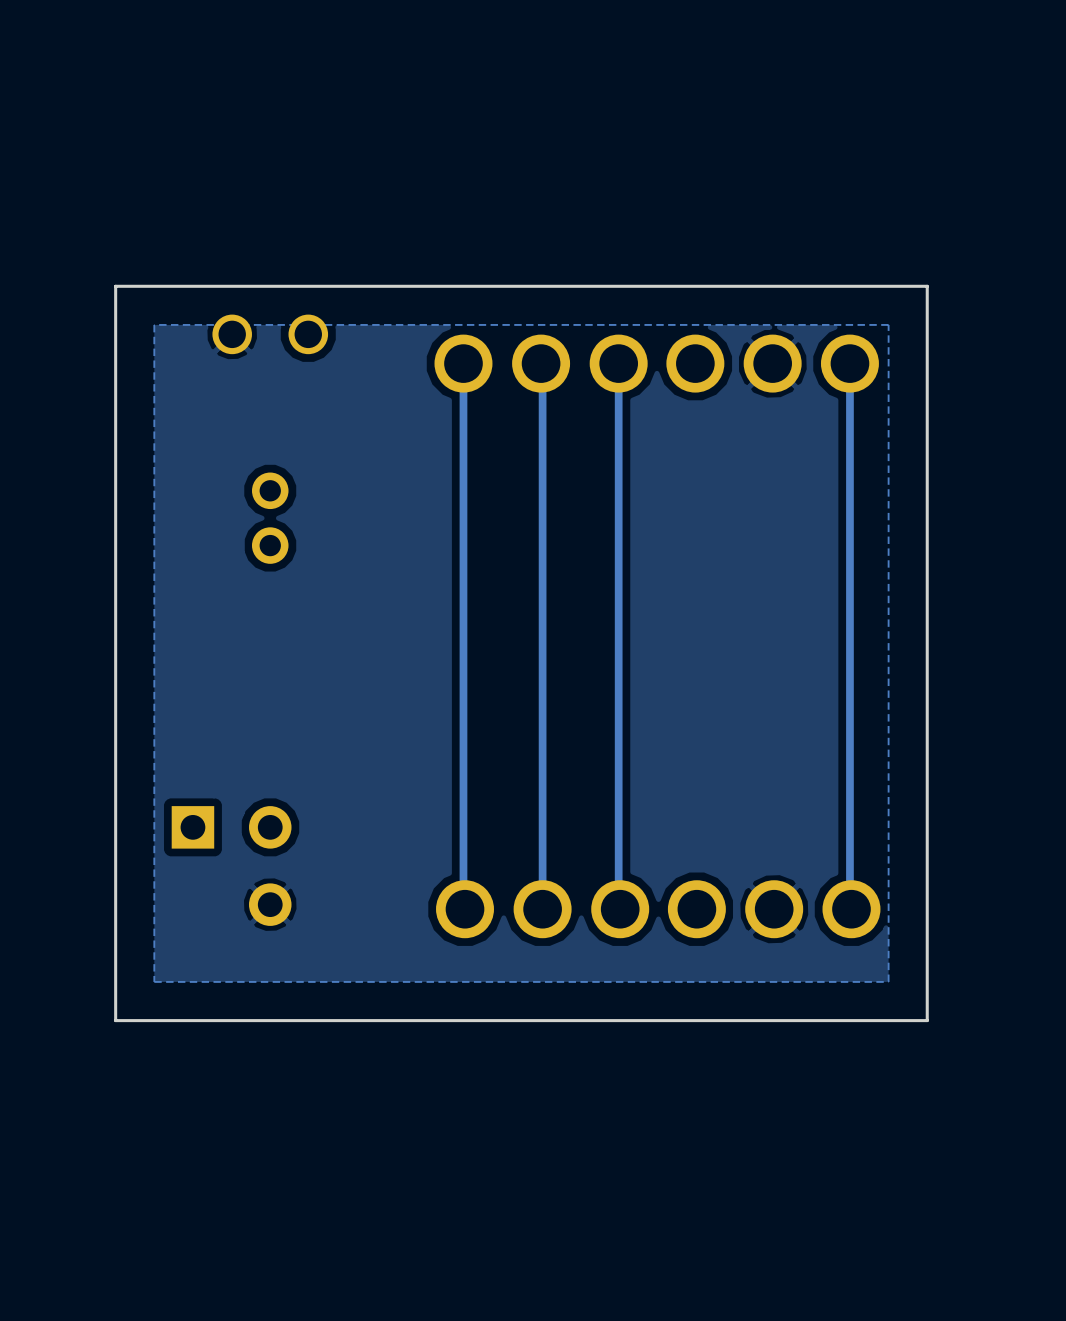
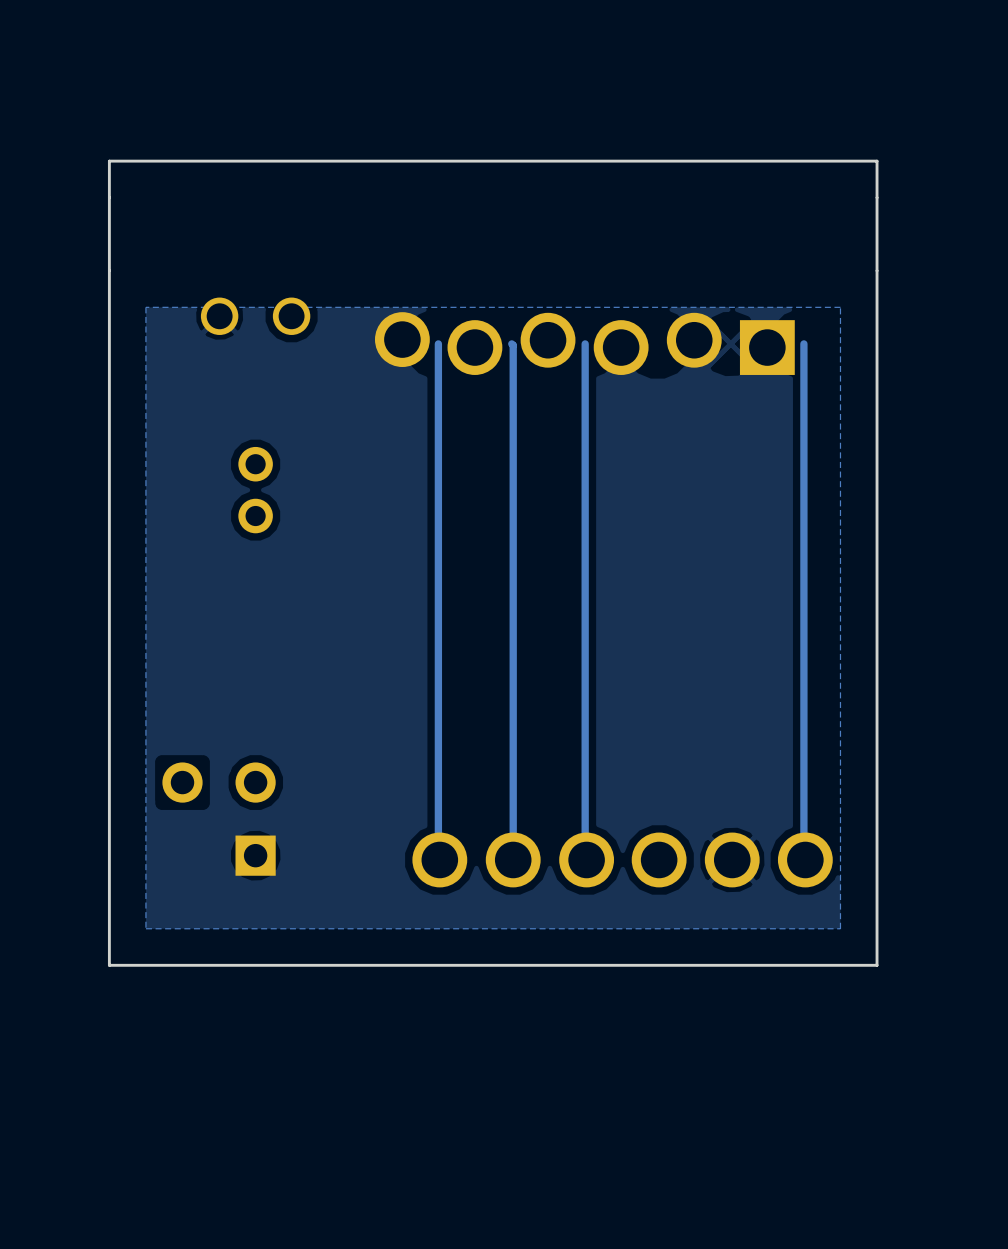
board edge: (927, 286) (115, 286) -> (877, 270) (877, 161) (109, 161) (109, 270)
part: none -> (584, 343)
part: (656, 363) -> none
part footprint: [171, 806, 292, 926] -> [162, 762, 276, 876]

